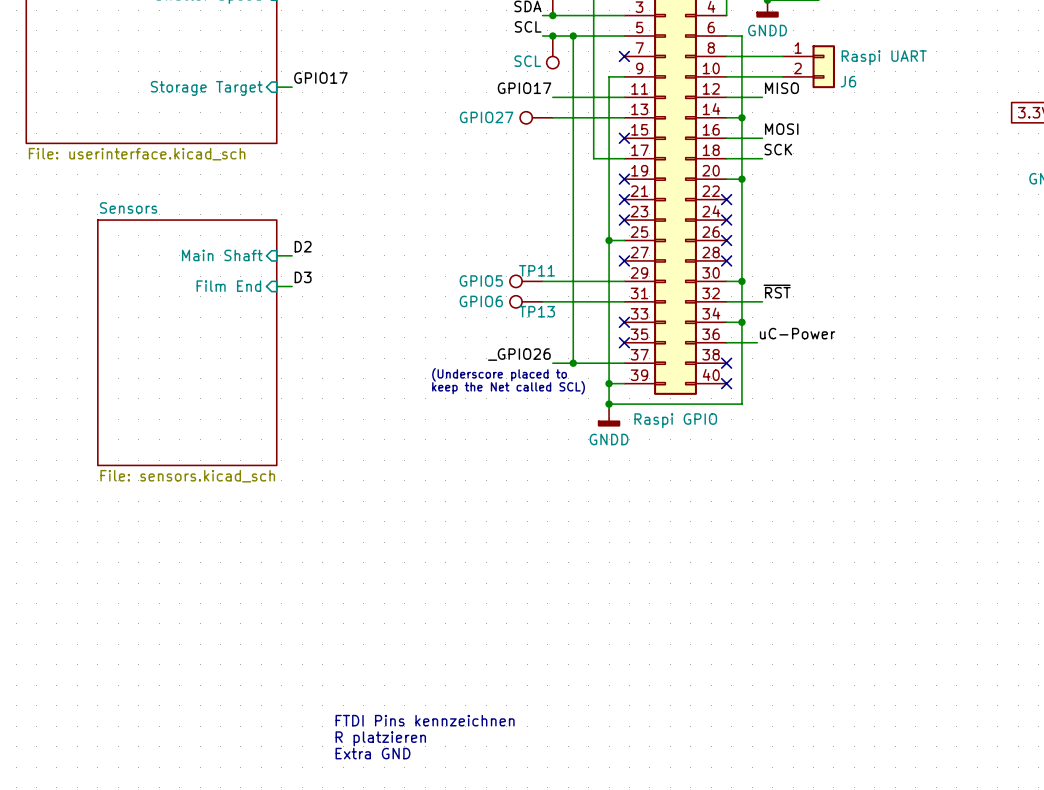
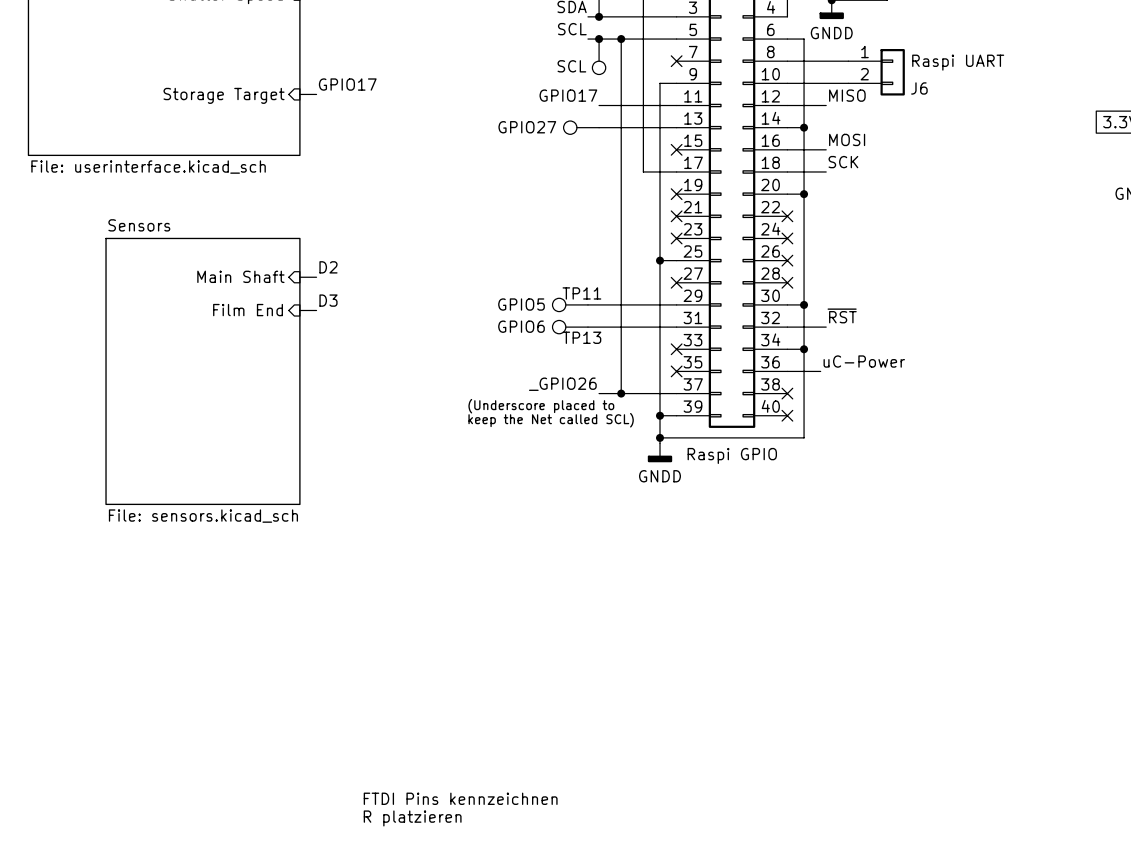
text: FTDI Pins kennzeichnen (425, 720) -> none
text: R platzieren (380, 738) -> FTDI Pins kennzeichnen (460, 798)
text: Extra GND (372, 753) -> R platzieren (412, 818)

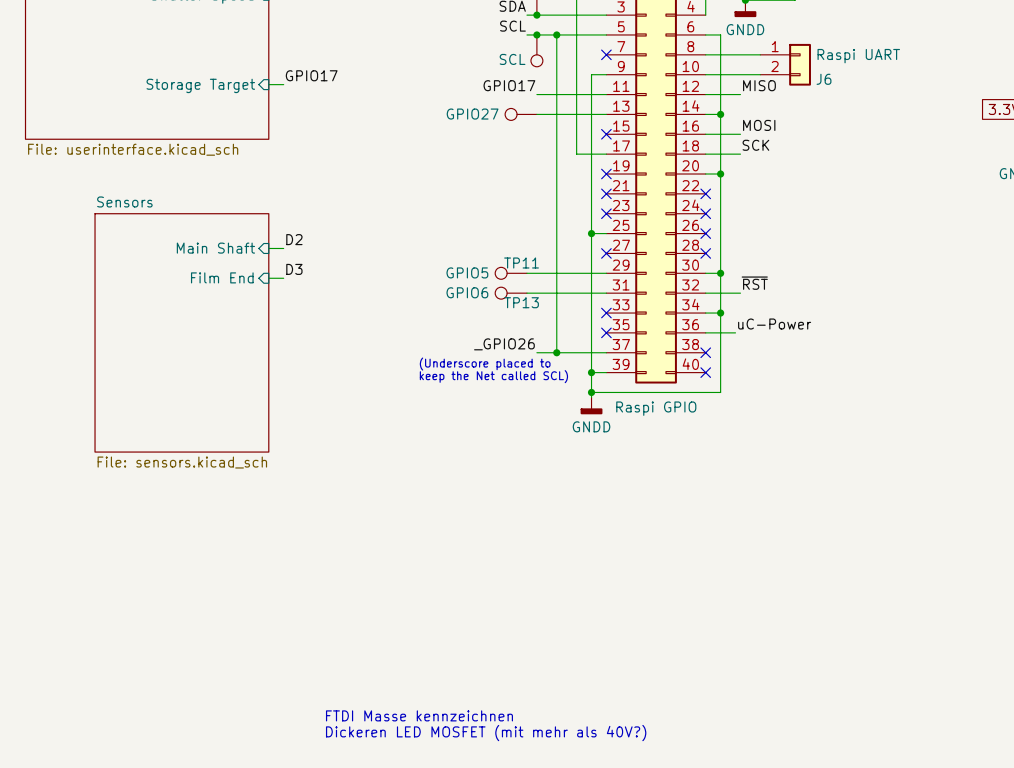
text: FTDI Pins kennzeichnen (460, 798) -> FTDI Masse kennzeichnen (419, 715)
text: R platzieren (412, 818) -> Dickeren LED MOSFET (mit mehr als 40V?) (486, 733)

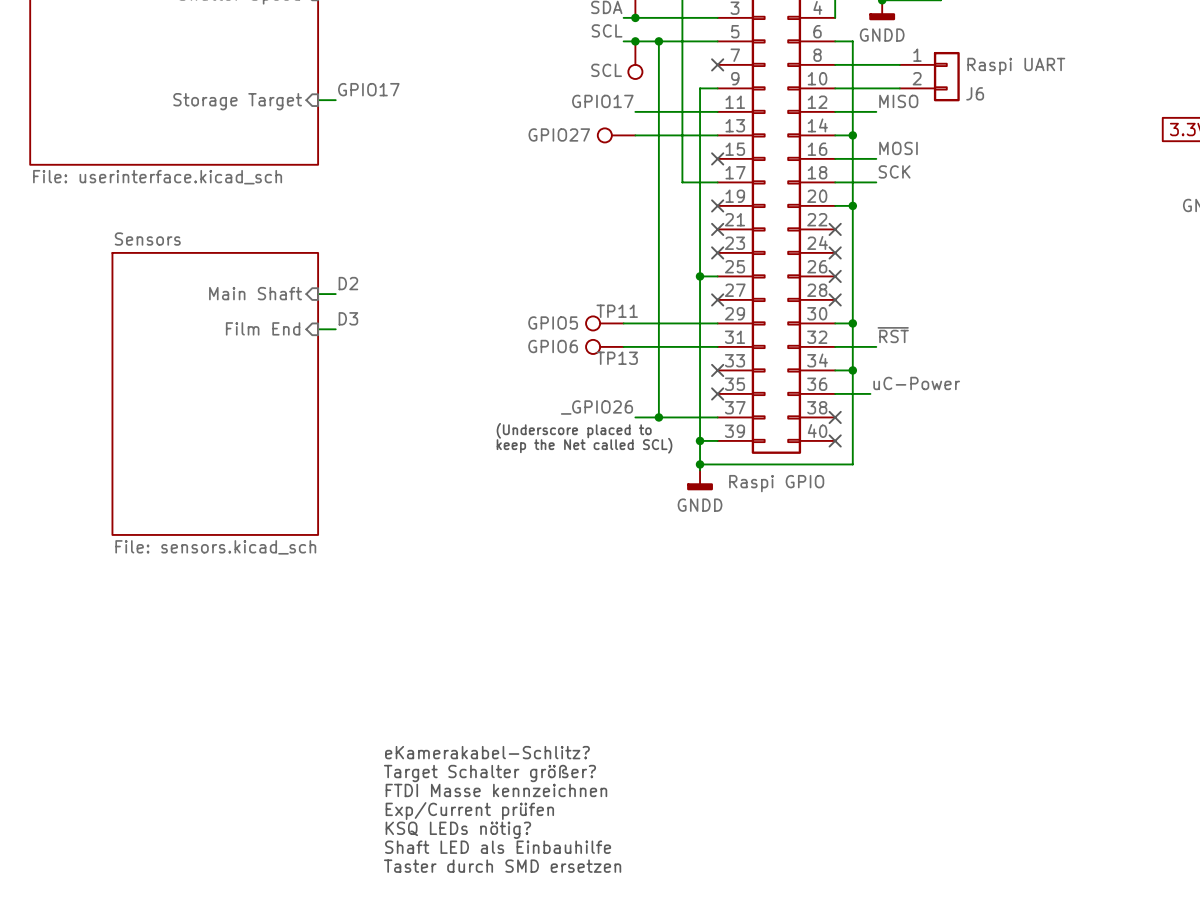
text: none -> eKamerakabel-Schlitz? (487, 752)
text: none -> Target Schalter größer? (489, 773)
text: none -> FTDI Masse kennzeichnen (496, 790)
text: none -> Exp/Current prüfen (469, 811)
text: none -> KSQ LEDs nötig? (458, 830)
text: FTDI Masse kennzeichnen (419, 715) -> Shaft LED als Einbauhilfe (498, 847)
text: Dickeren LED MOSFET (mit mehr als 40V?) (486, 733) -> Taster durch SMD ersetzen (502, 866)

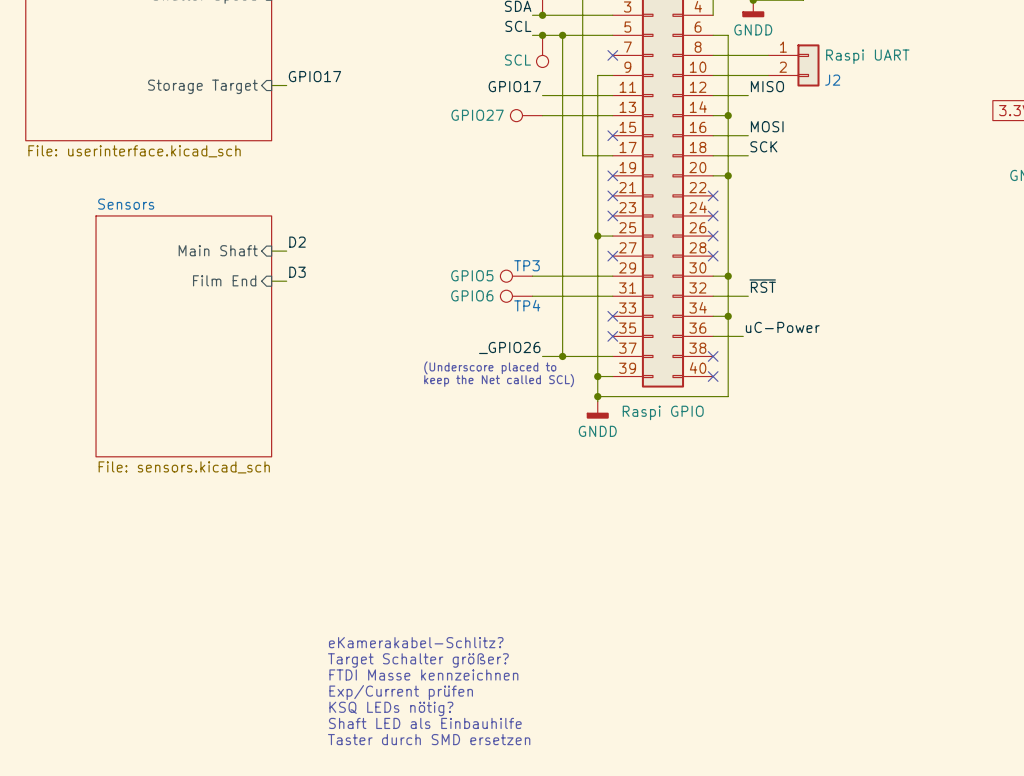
J6 name: J6 (975, 93) -> J2 (832, 80)
TP11 name: TP11 (617, 311) -> TP3 (527, 265)
TP13 name: TP13 (617, 358) -> TP4 (527, 305)

